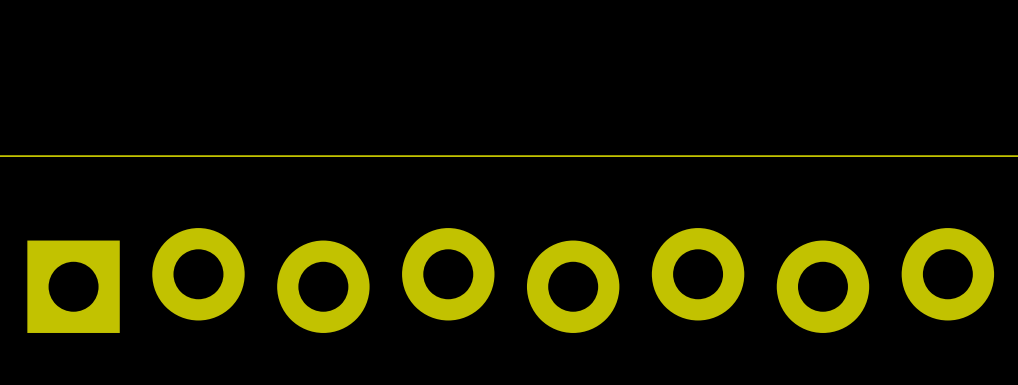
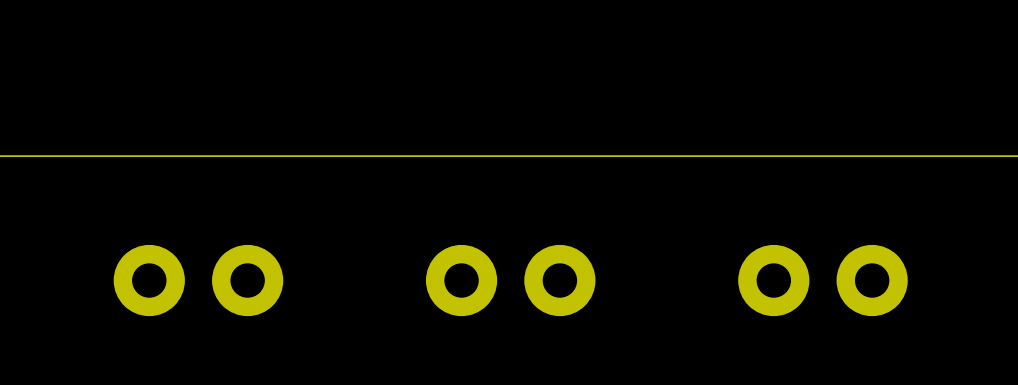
part footprint: [27, 228, 995, 333] -> [425, 244, 596, 317]
part: none -> (198, 280)
part: none -> (822, 280)

